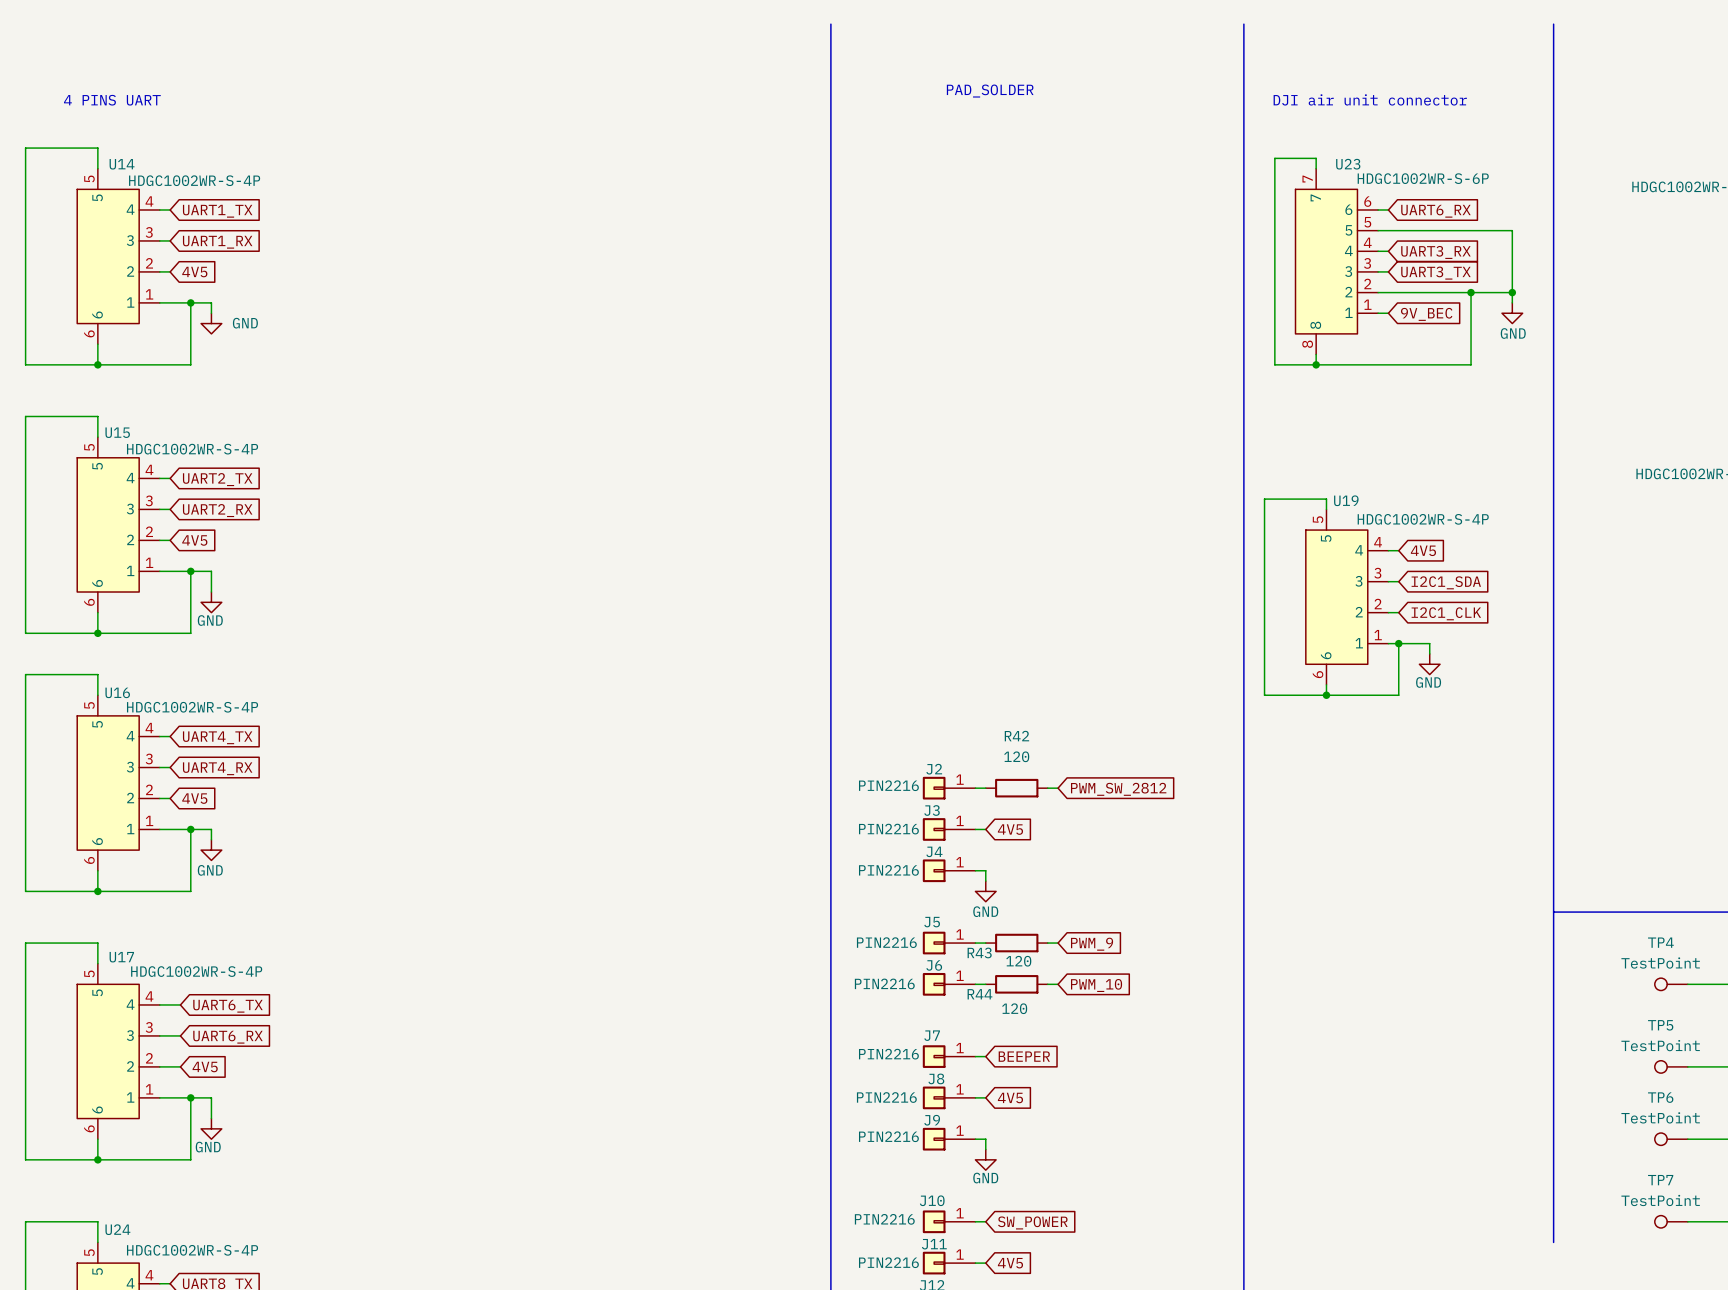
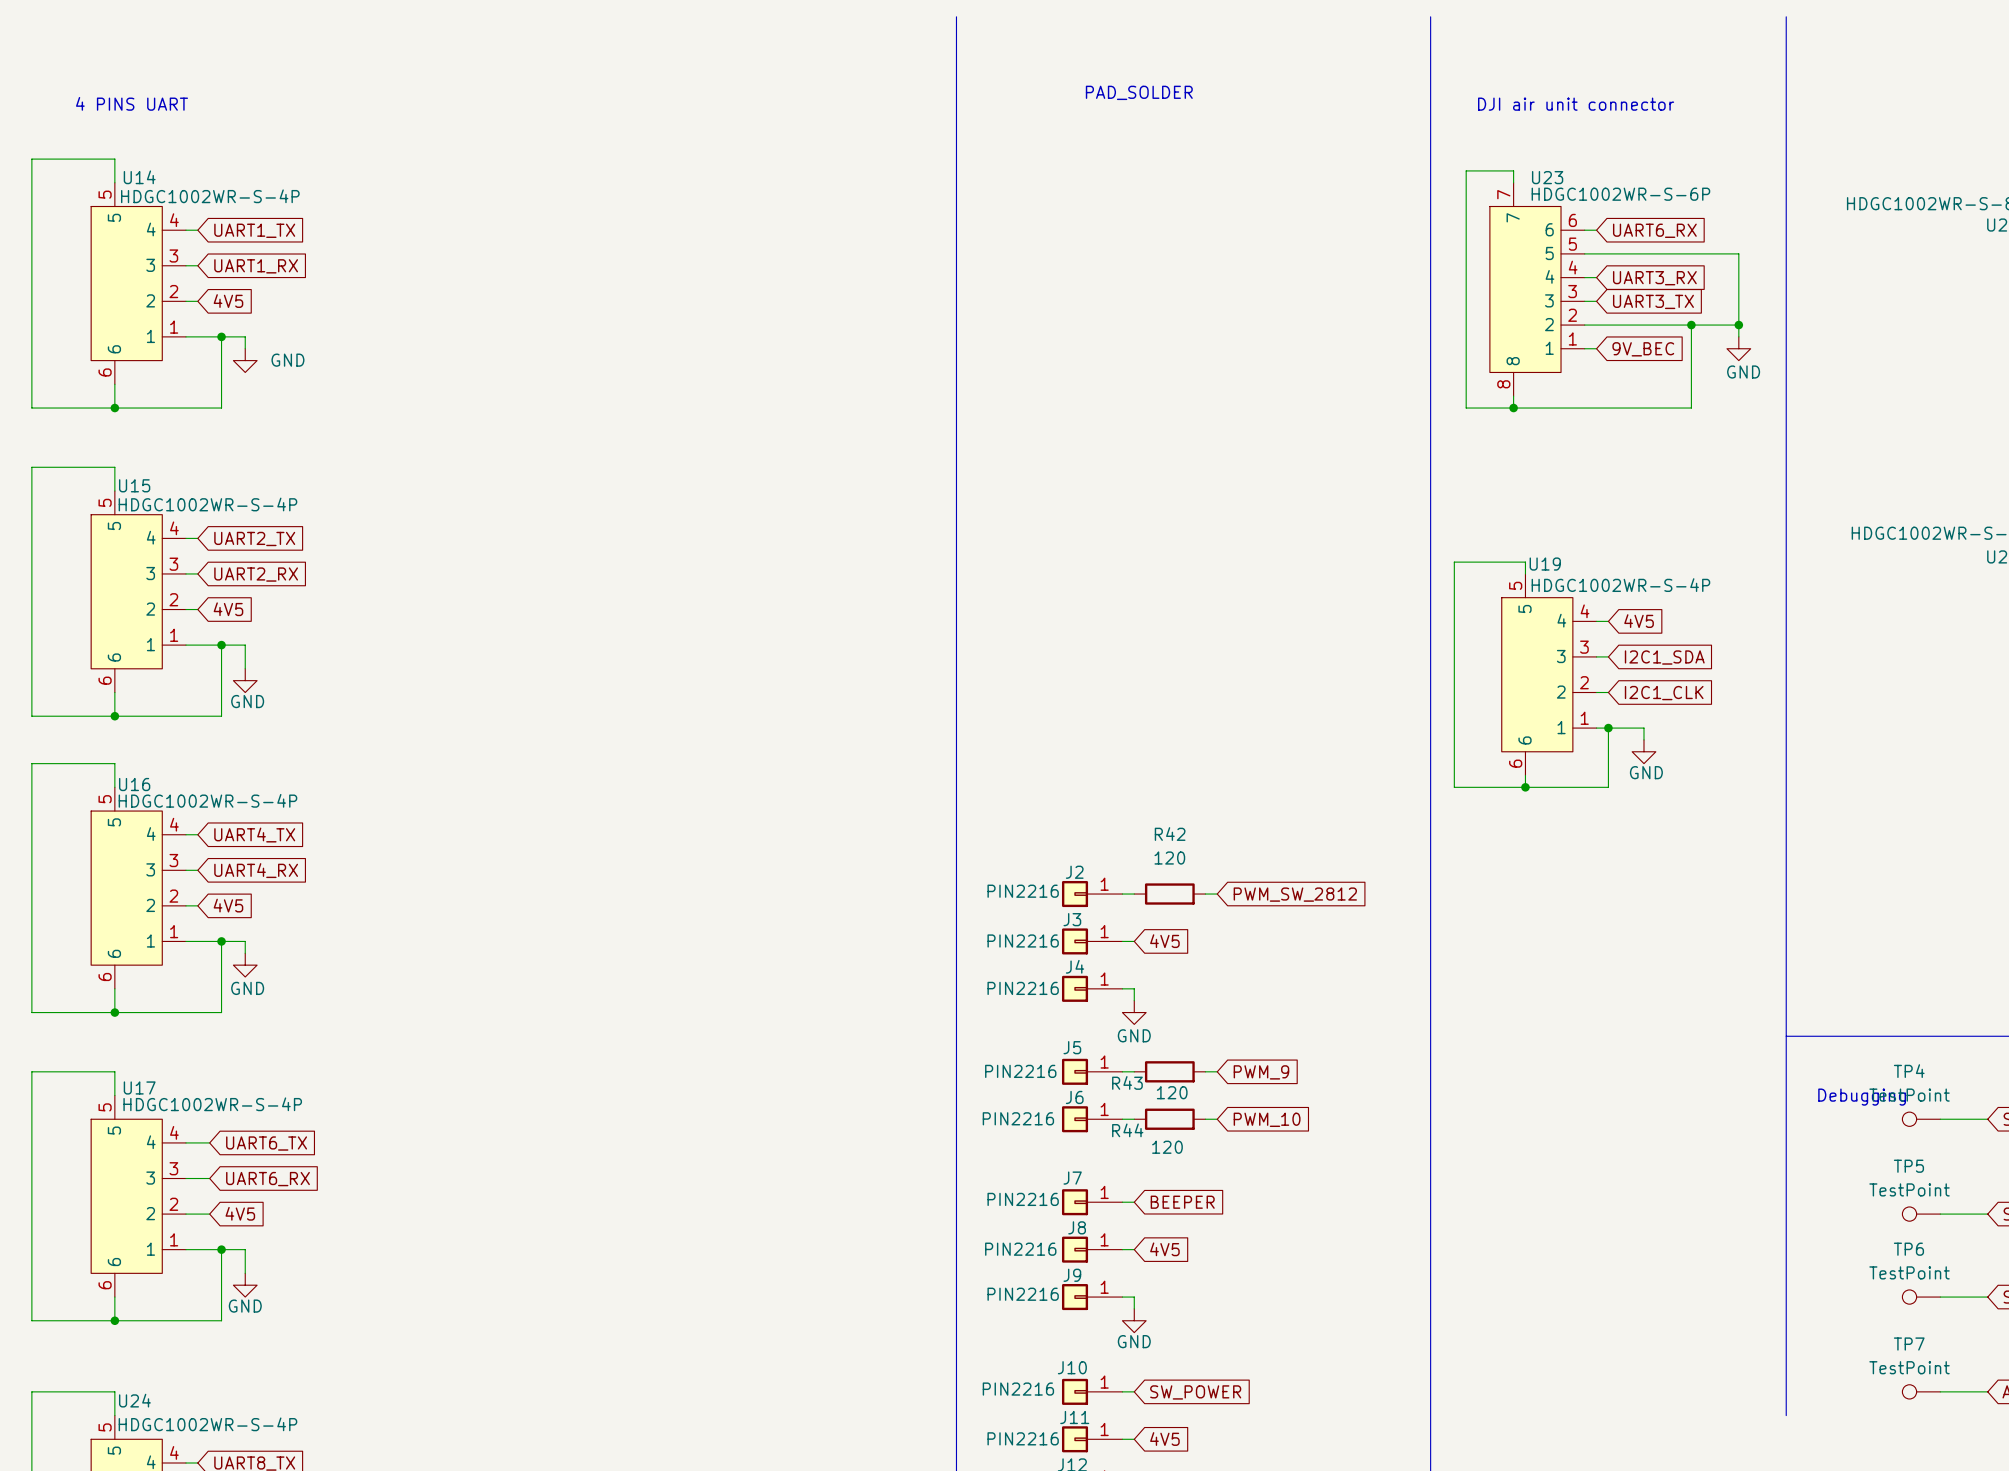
text: none -> Debugging (1862, 1097)

